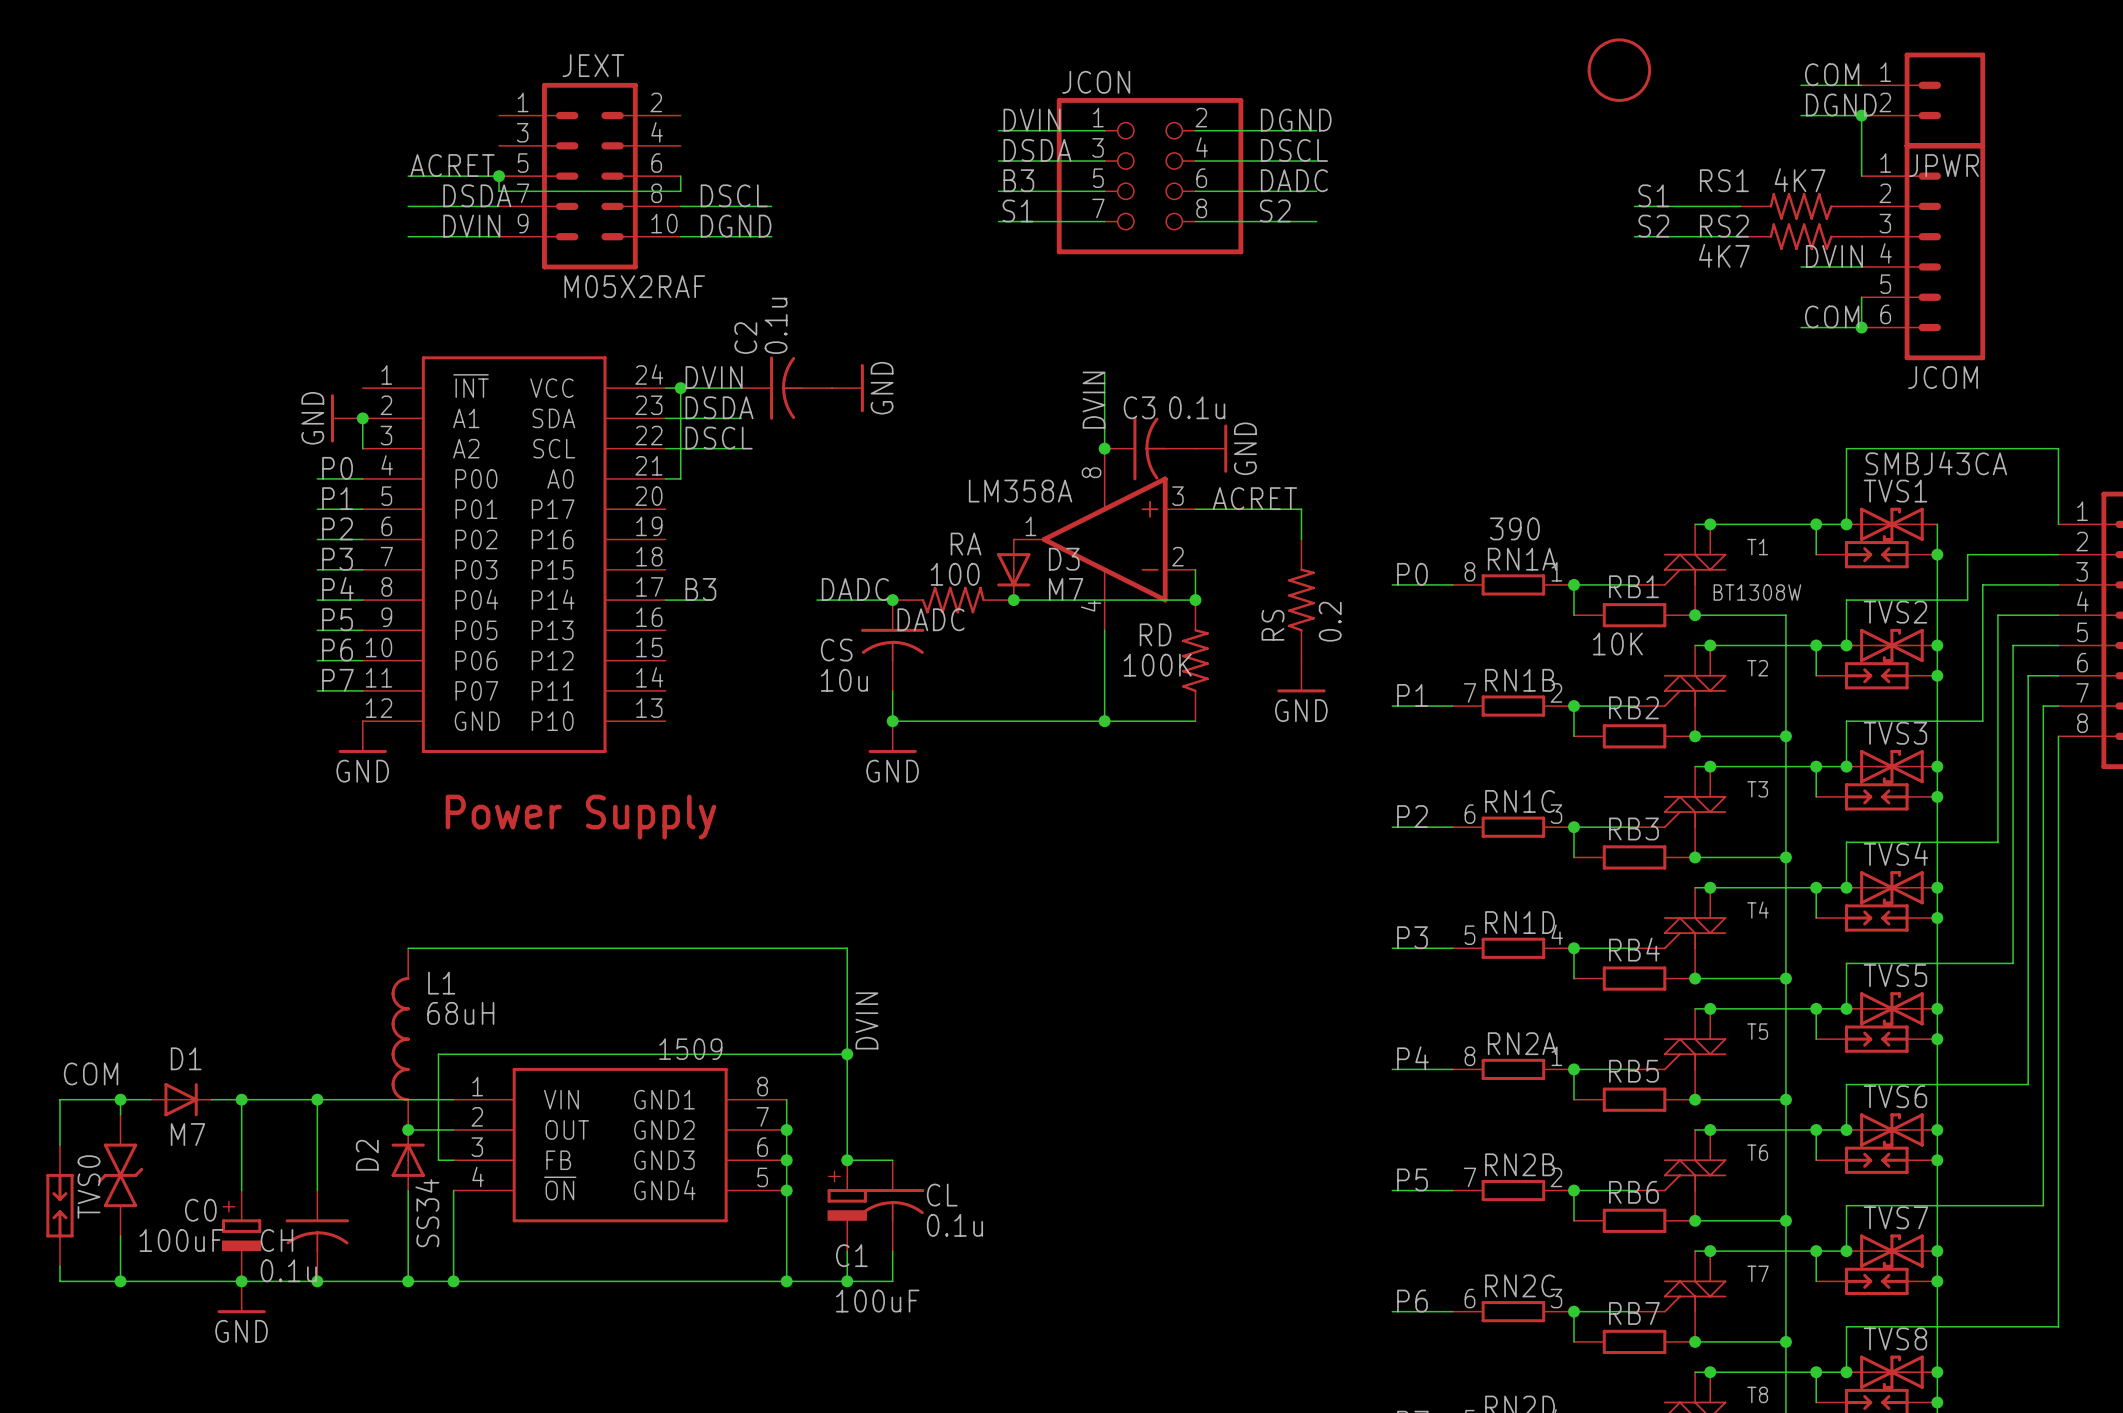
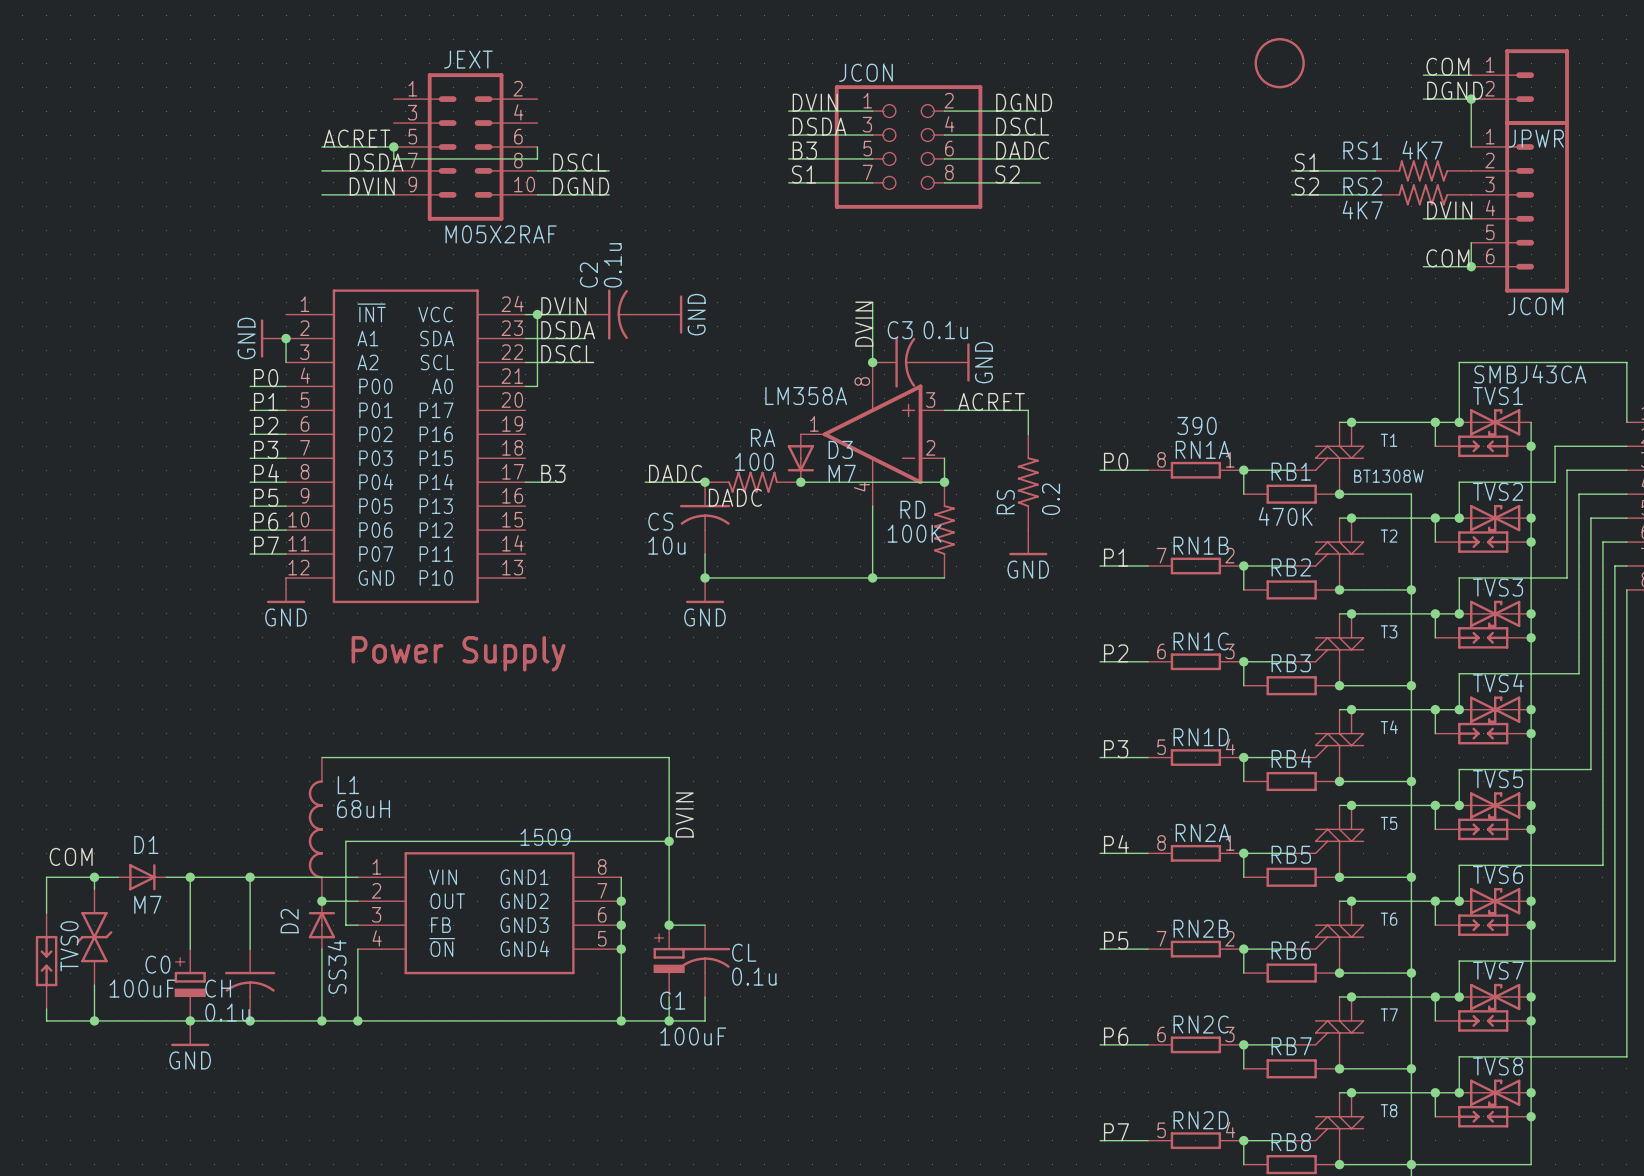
RB1 value: 10K (1617, 643) -> 470K (1285, 516)

